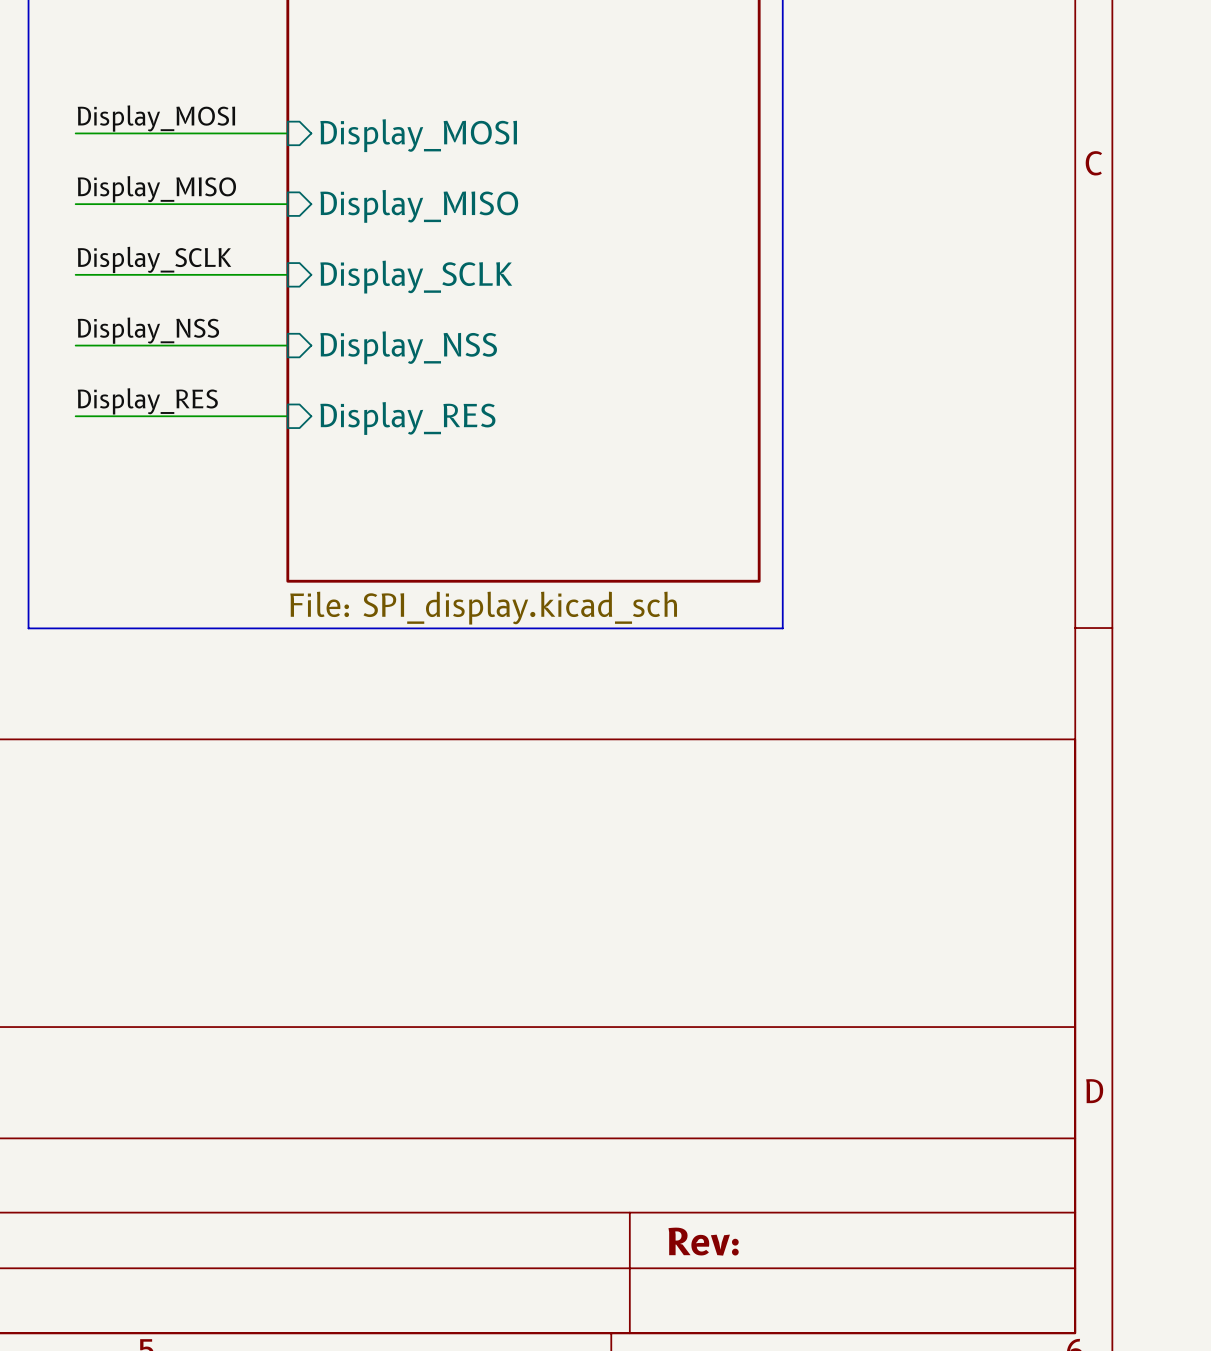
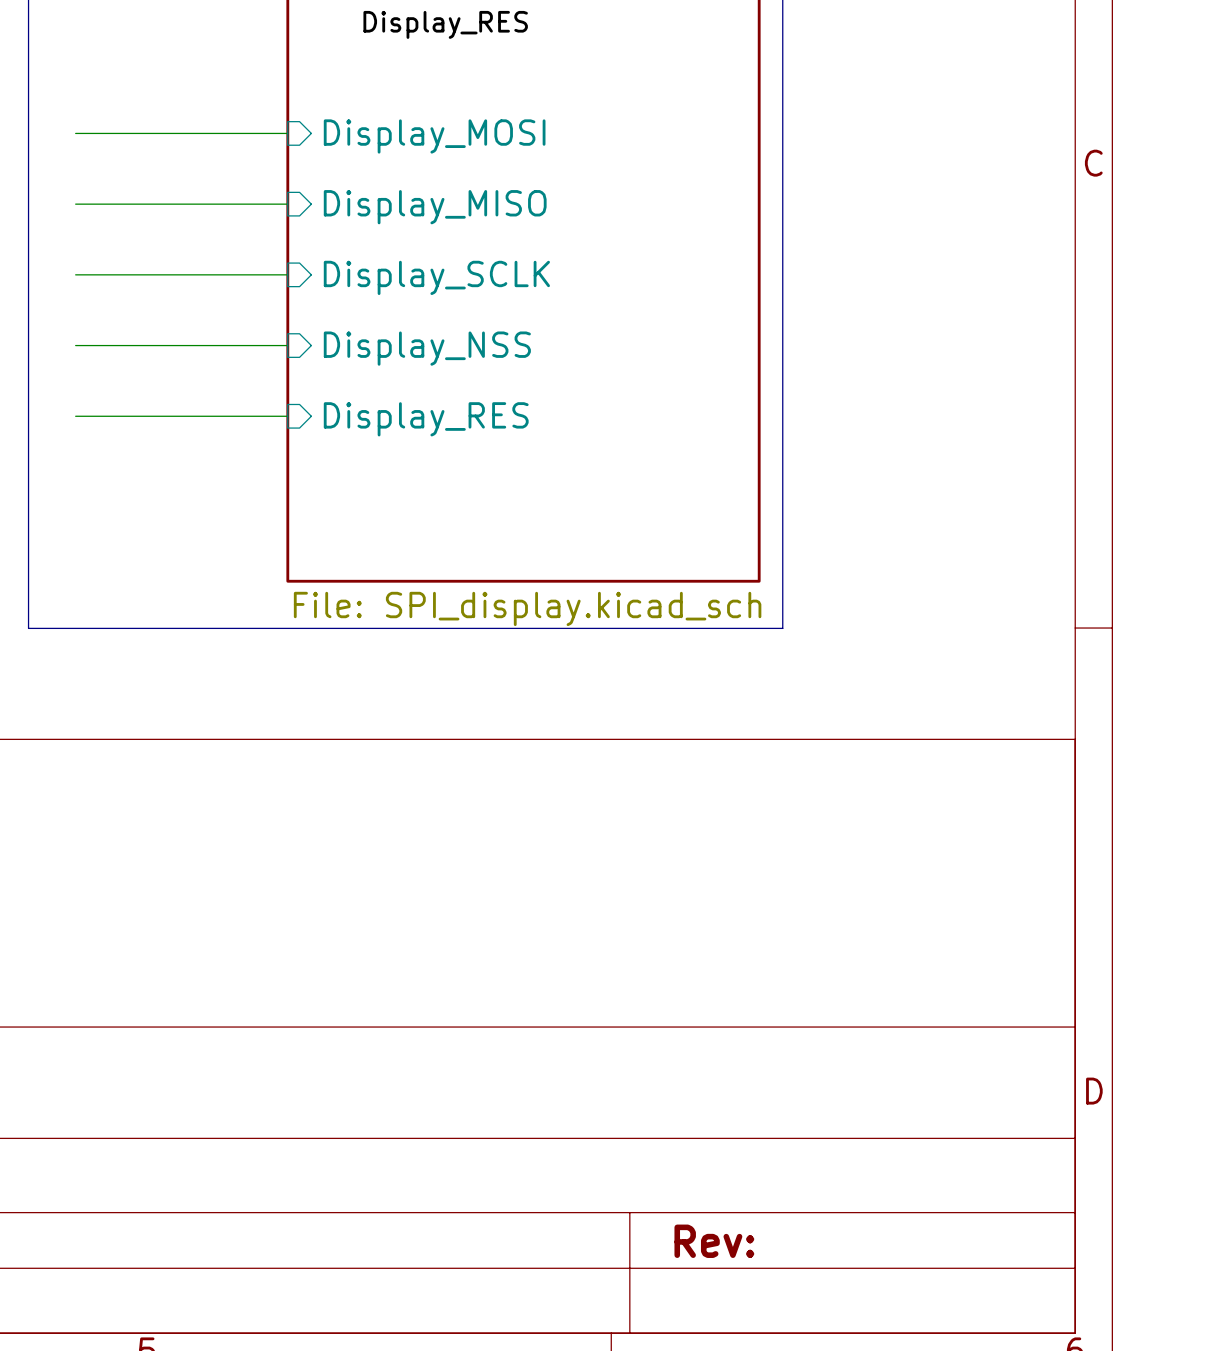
label: none -> Display_RES (445, 24)
label: Display_MOSI (156, 118) -> none
label: Display_MISO (156, 189) -> none
label: Display_SCLK (154, 259) -> none
label: Display_NSS (148, 330) -> none
label: Display_RES (147, 401) -> none

